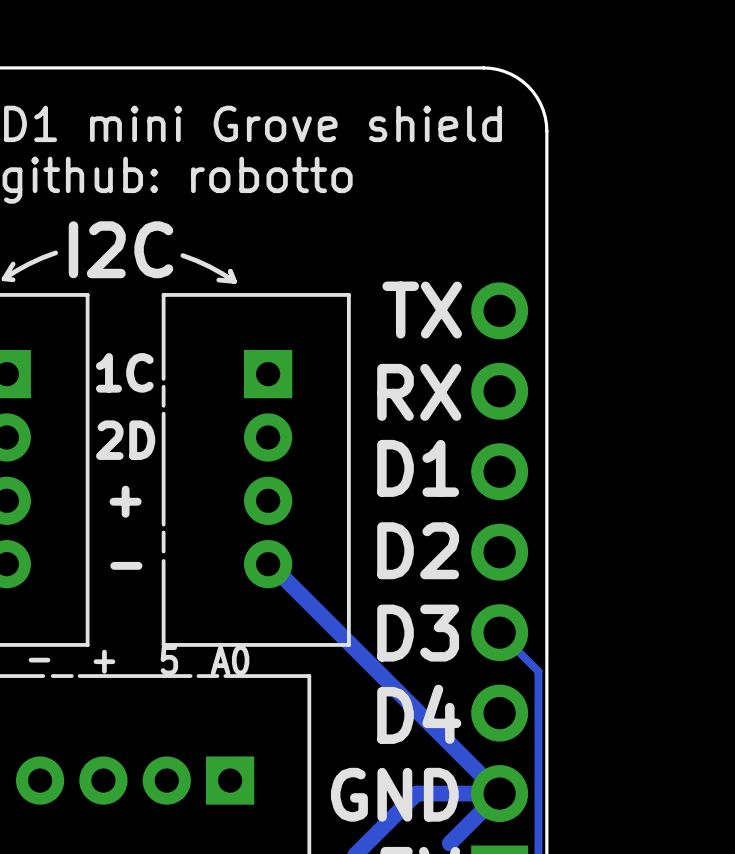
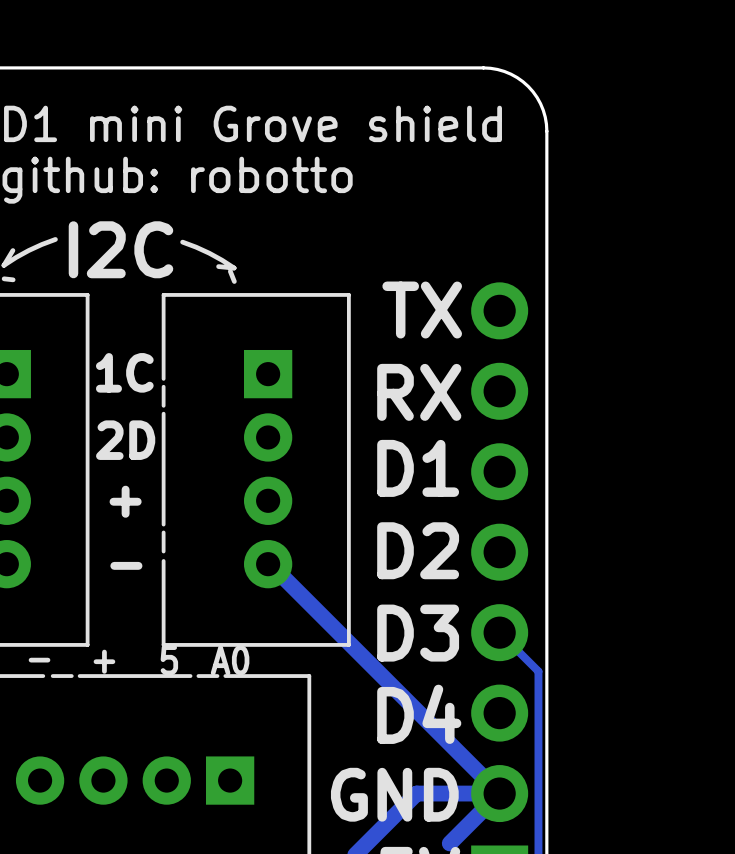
line: (55, 252) (28, 263) (4, 278) (13, 263) -> (55, 239) (28, 250) (3, 265) (12, 250)
line: (182, 255) (209, 266) (234, 281) (218, 280) -> (182, 242) (209, 253) (234, 268) (218, 266)

